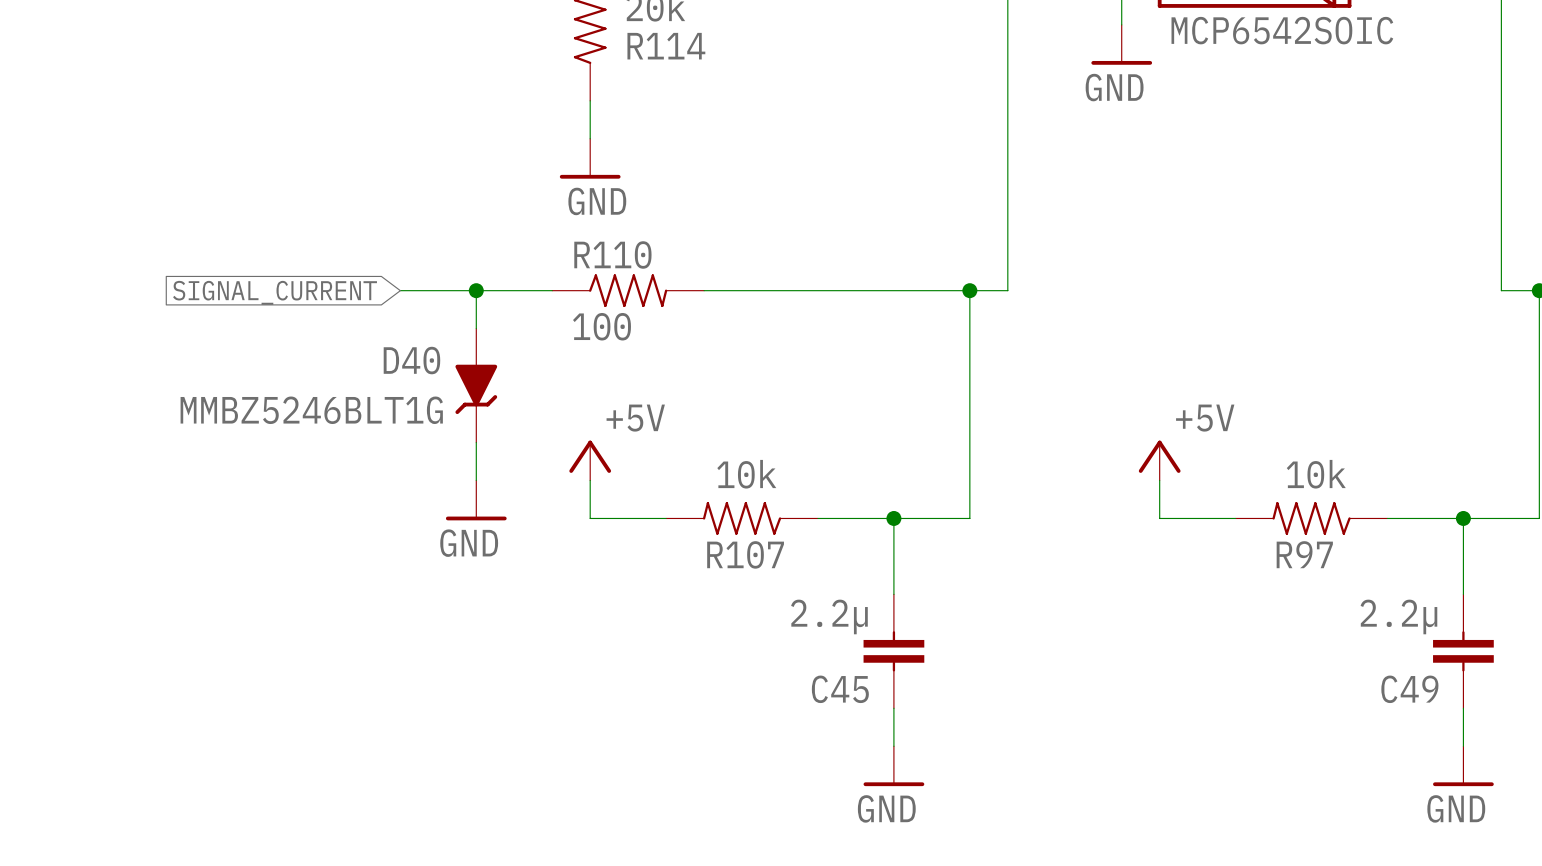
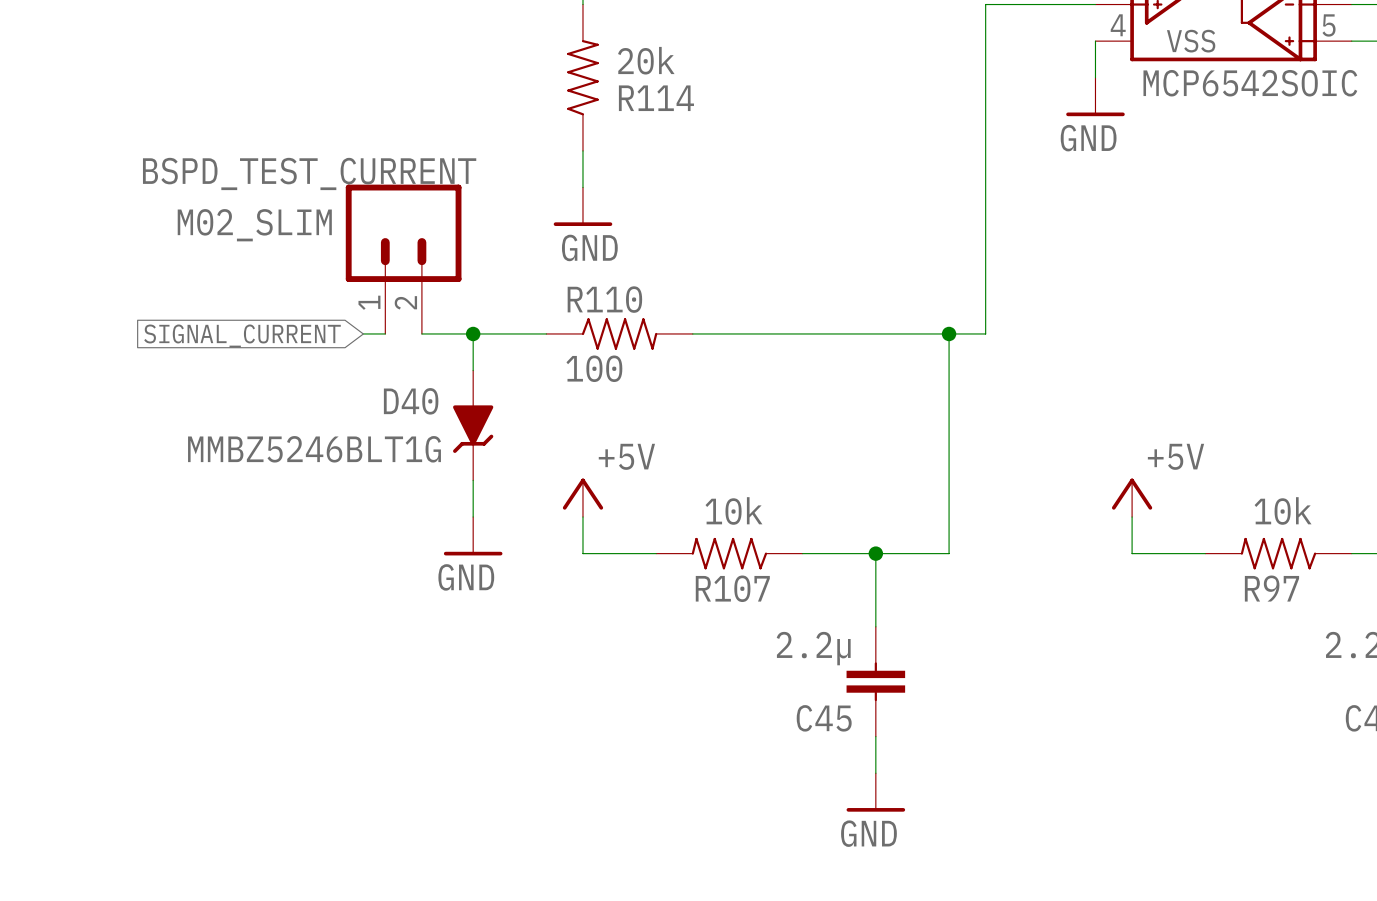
BSPD_TEST_CURRENT: none -> M02_SLIM (403, 259)
wire: (400, 290) (423, 290) -> (363, 333) (385, 333)
global label position: SIGNAL_CURRENT (275, 292) -> SIGNAL_CURRENT (242, 336)

